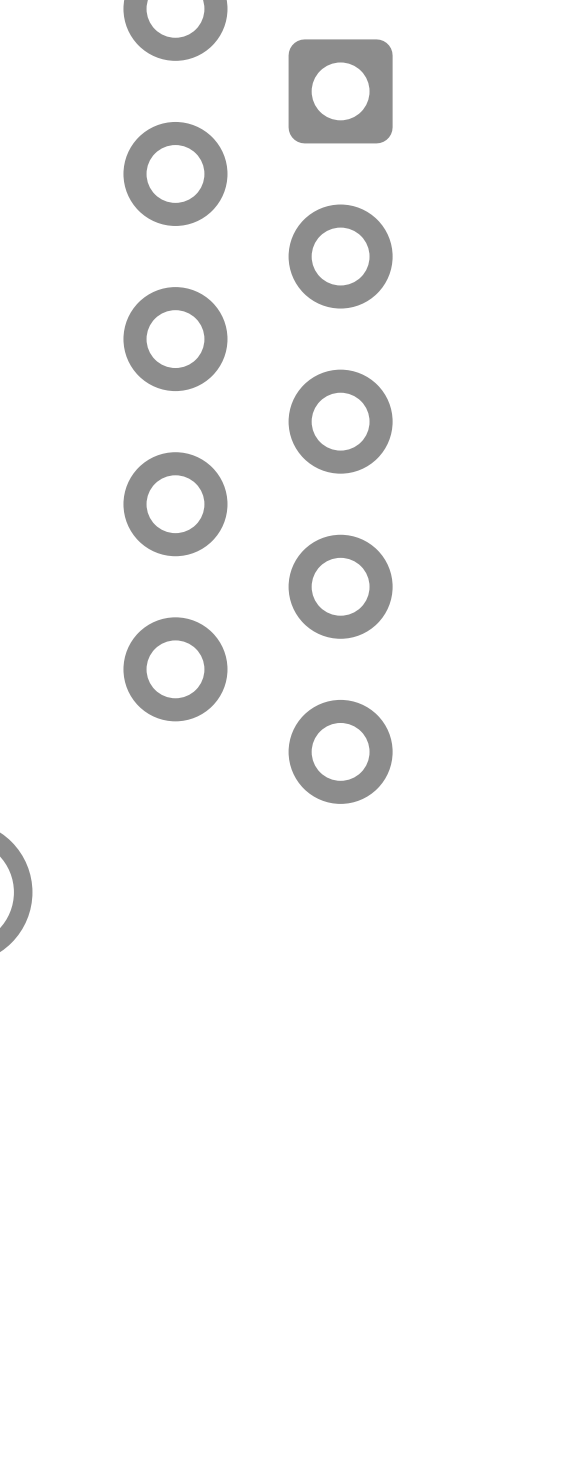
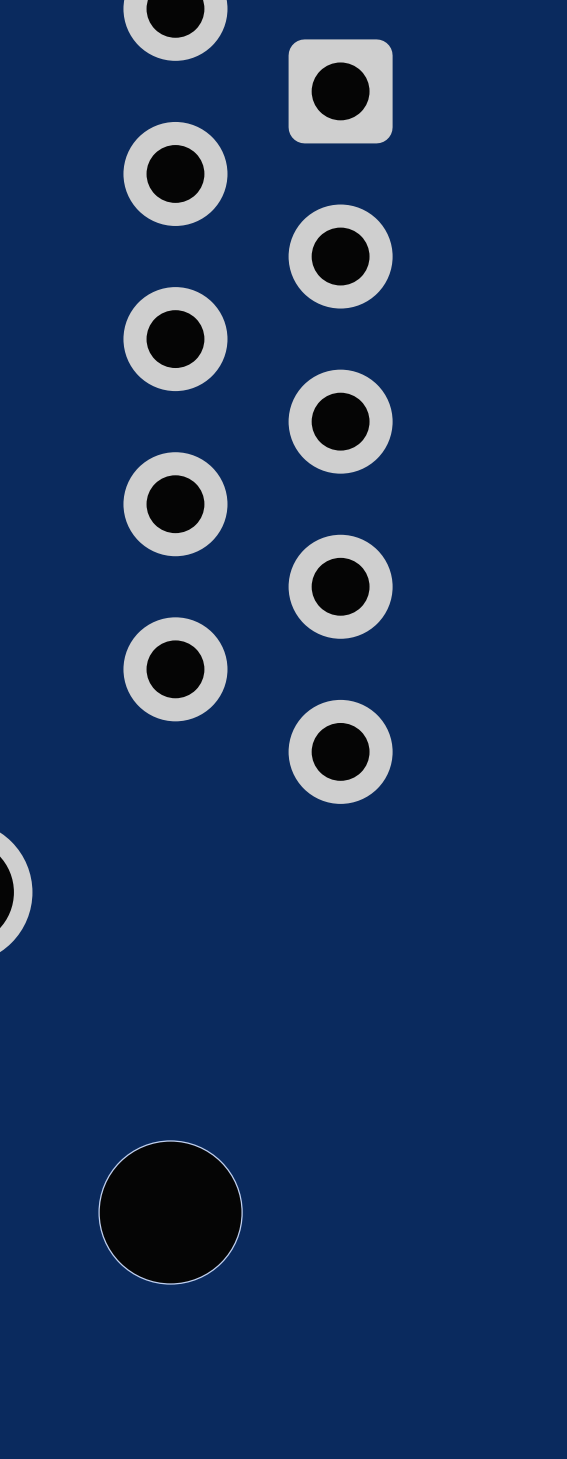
part: none -> (170, 1212)

